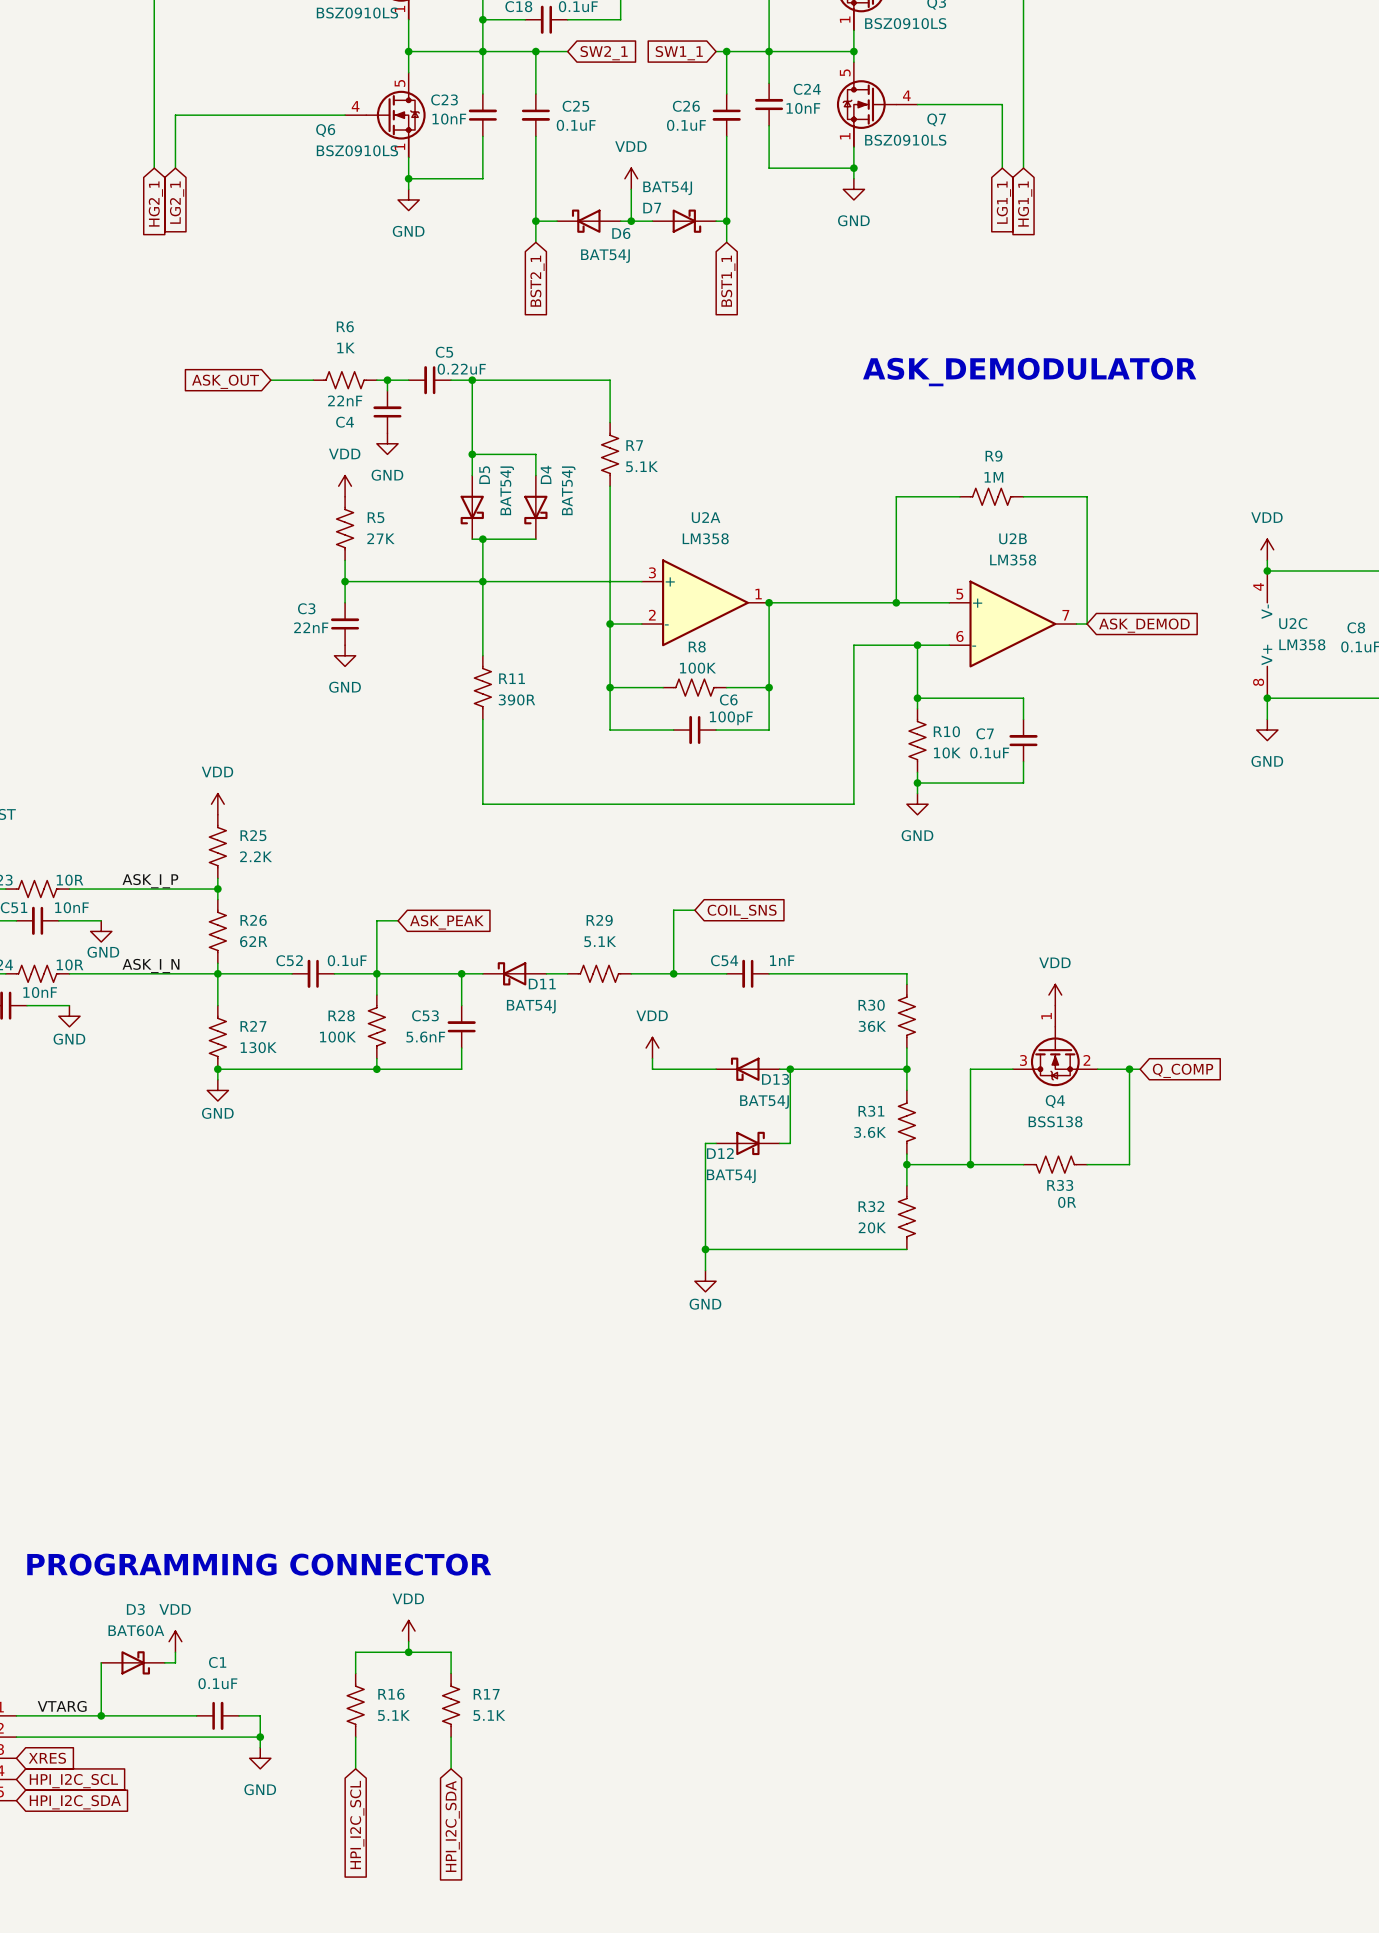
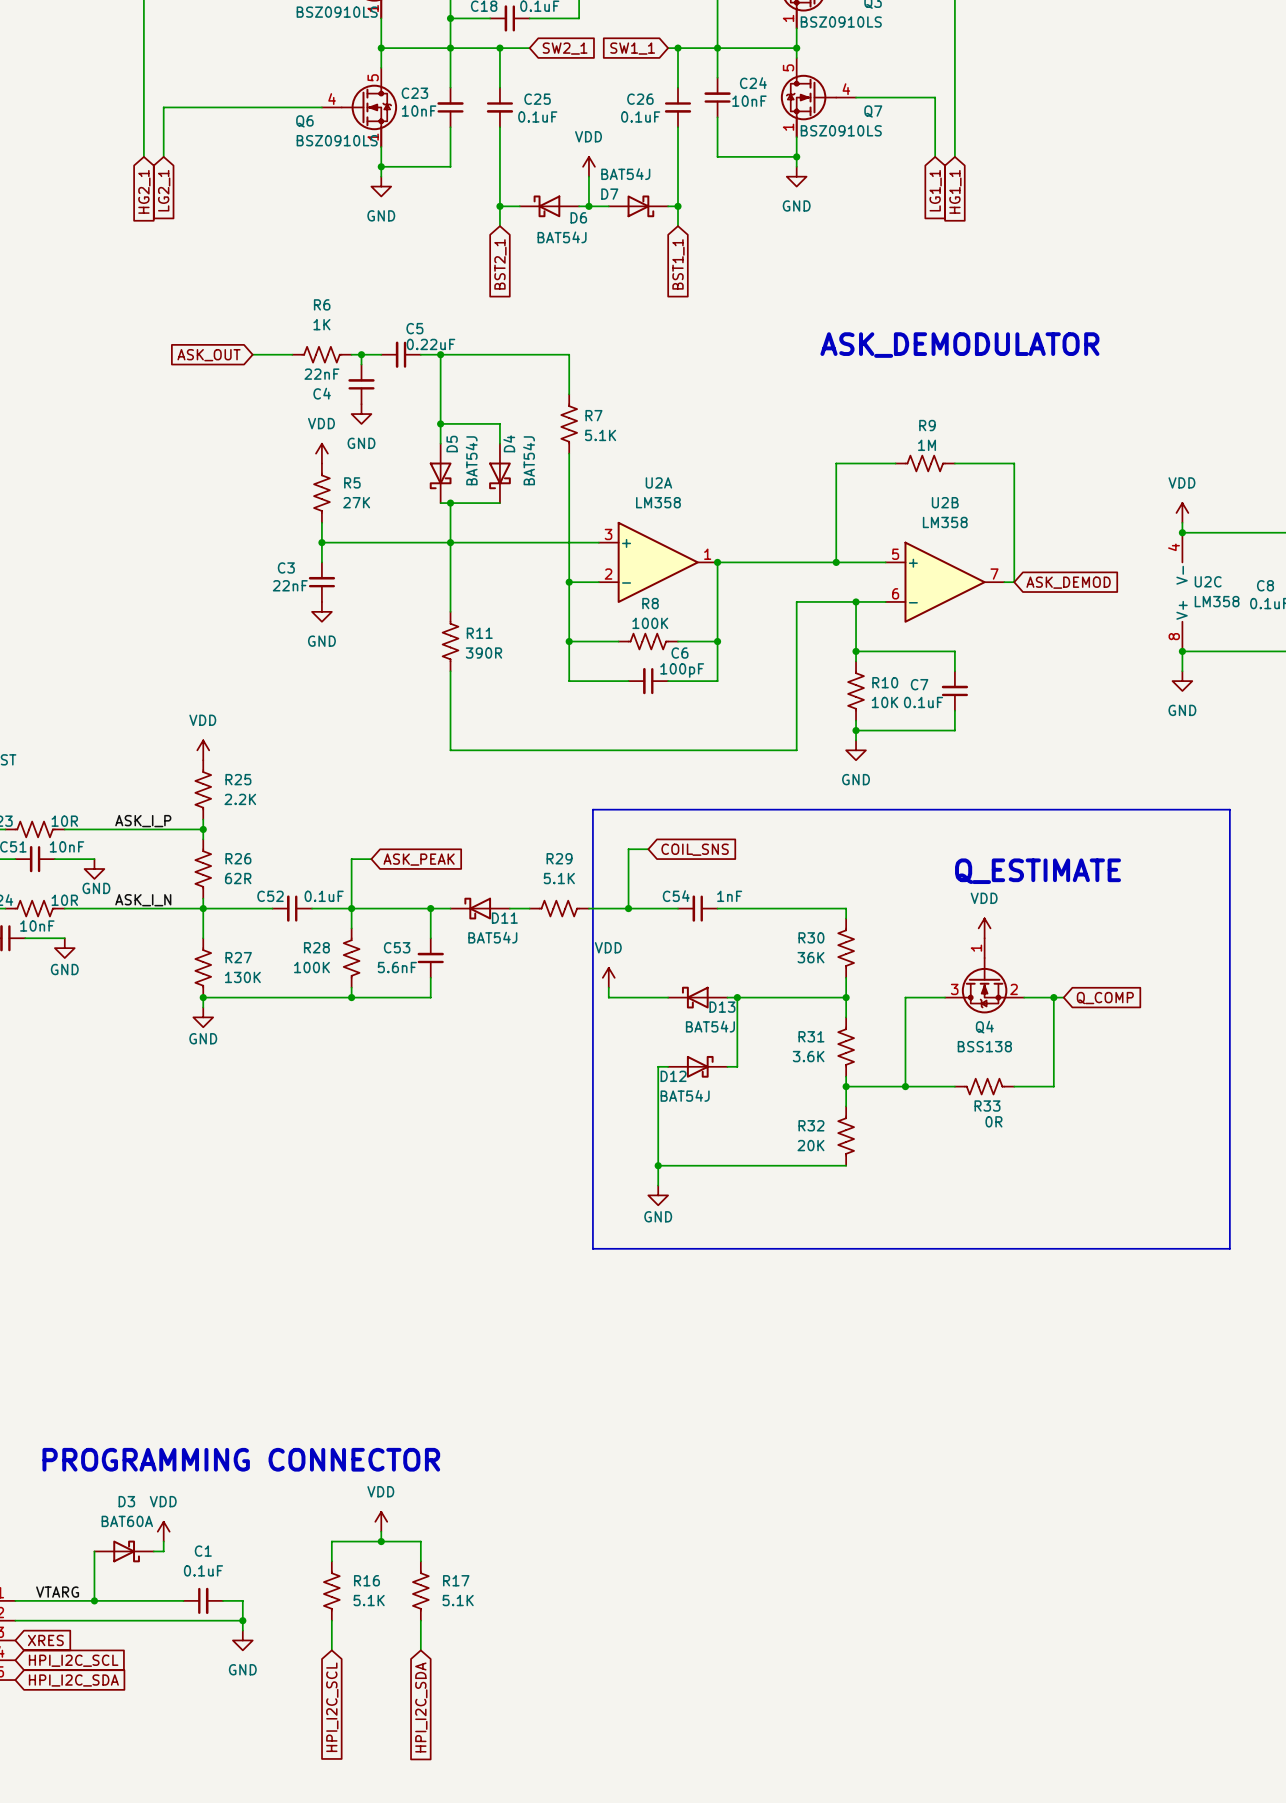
line: none -> (592, 809) (1229, 809) (1229, 1248) (592, 1248) (592, 809)
text: none -> Q_ESTIMATE (1038, 871)

